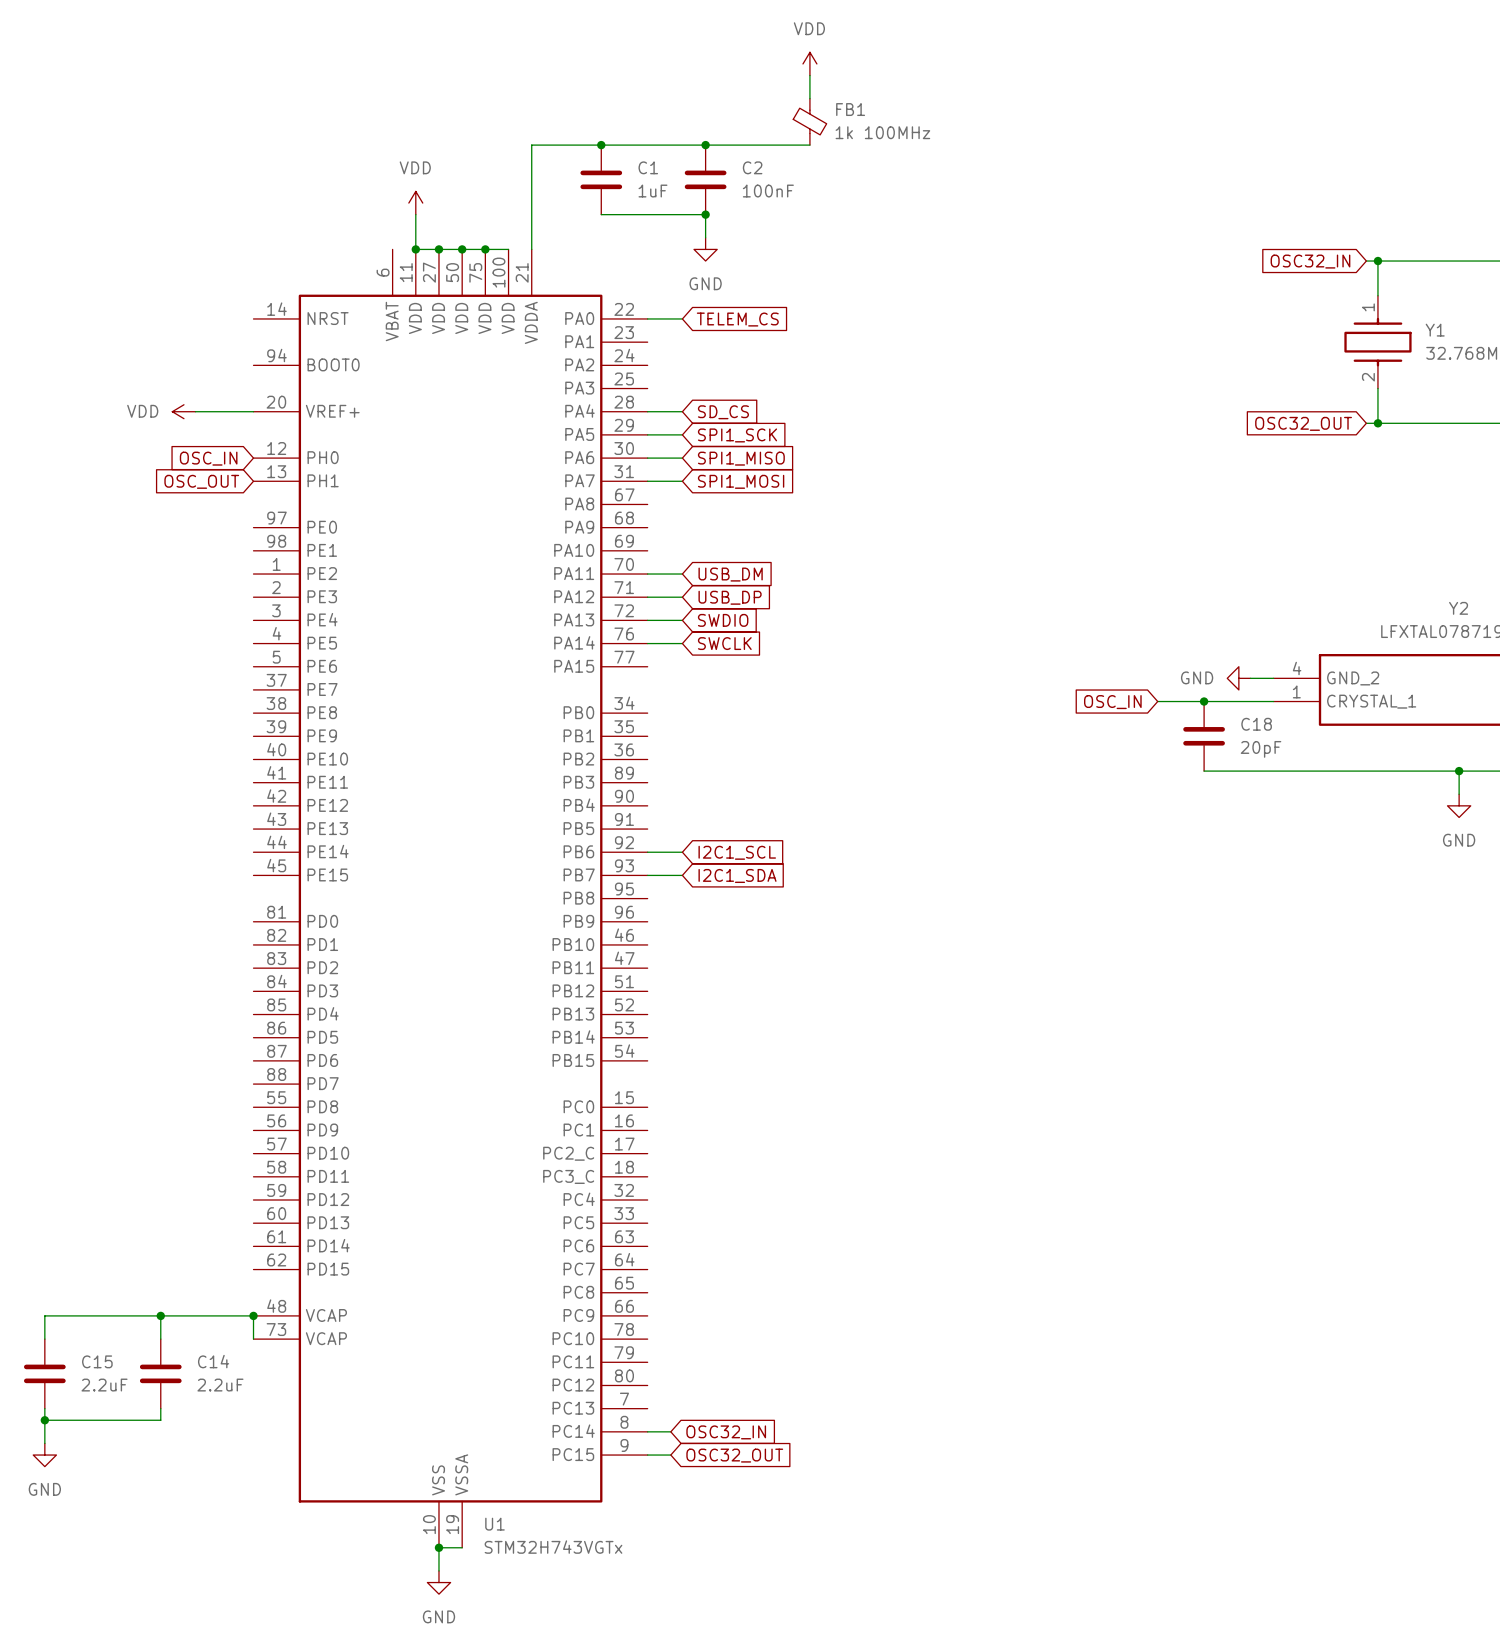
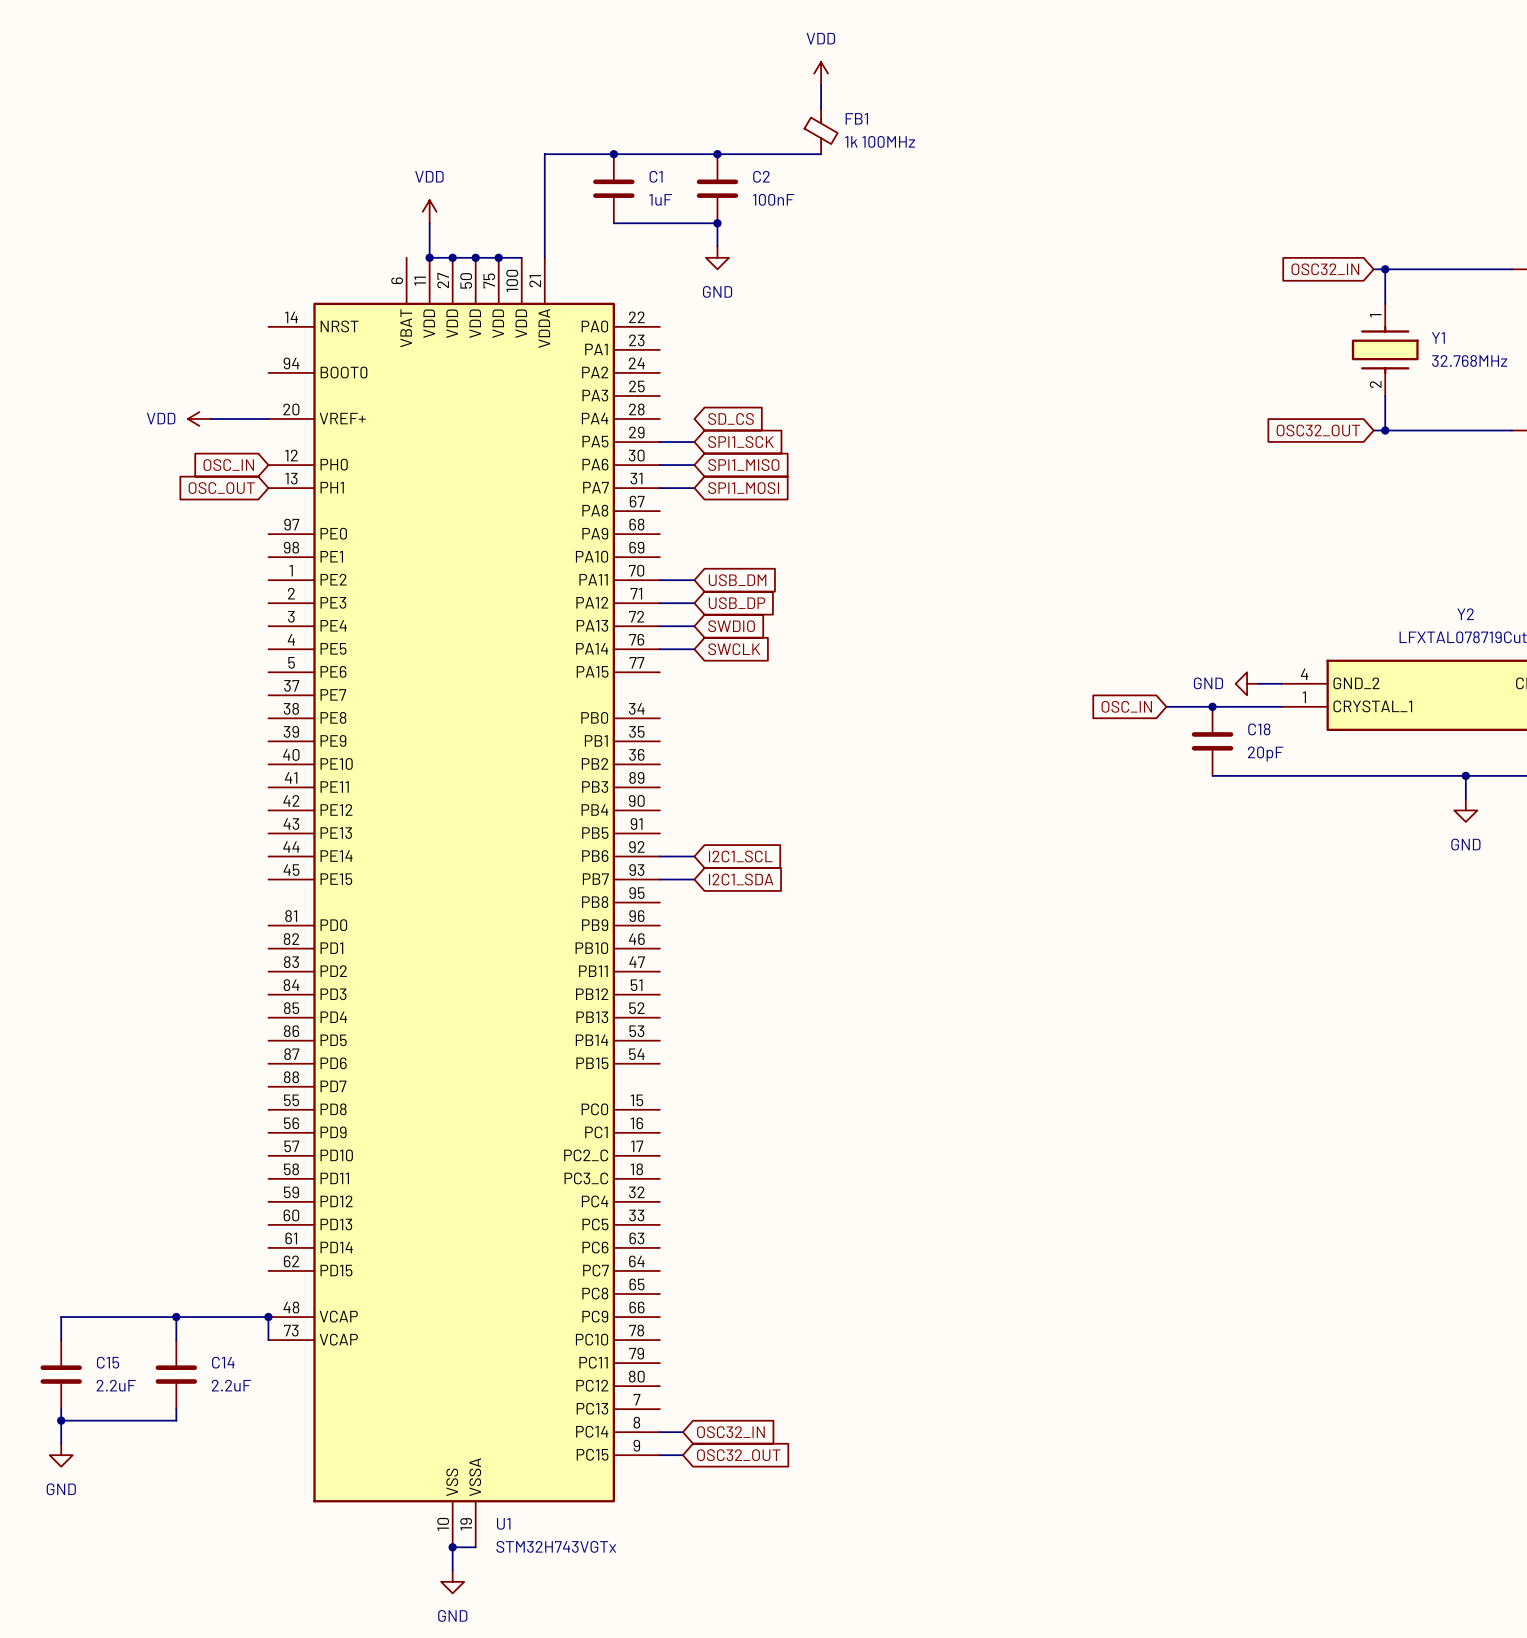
wire: (647, 318) (682, 318) -> none
global label: TELEM_CS (737, 319) -> none
wire: (647, 411) (682, 411) -> none

